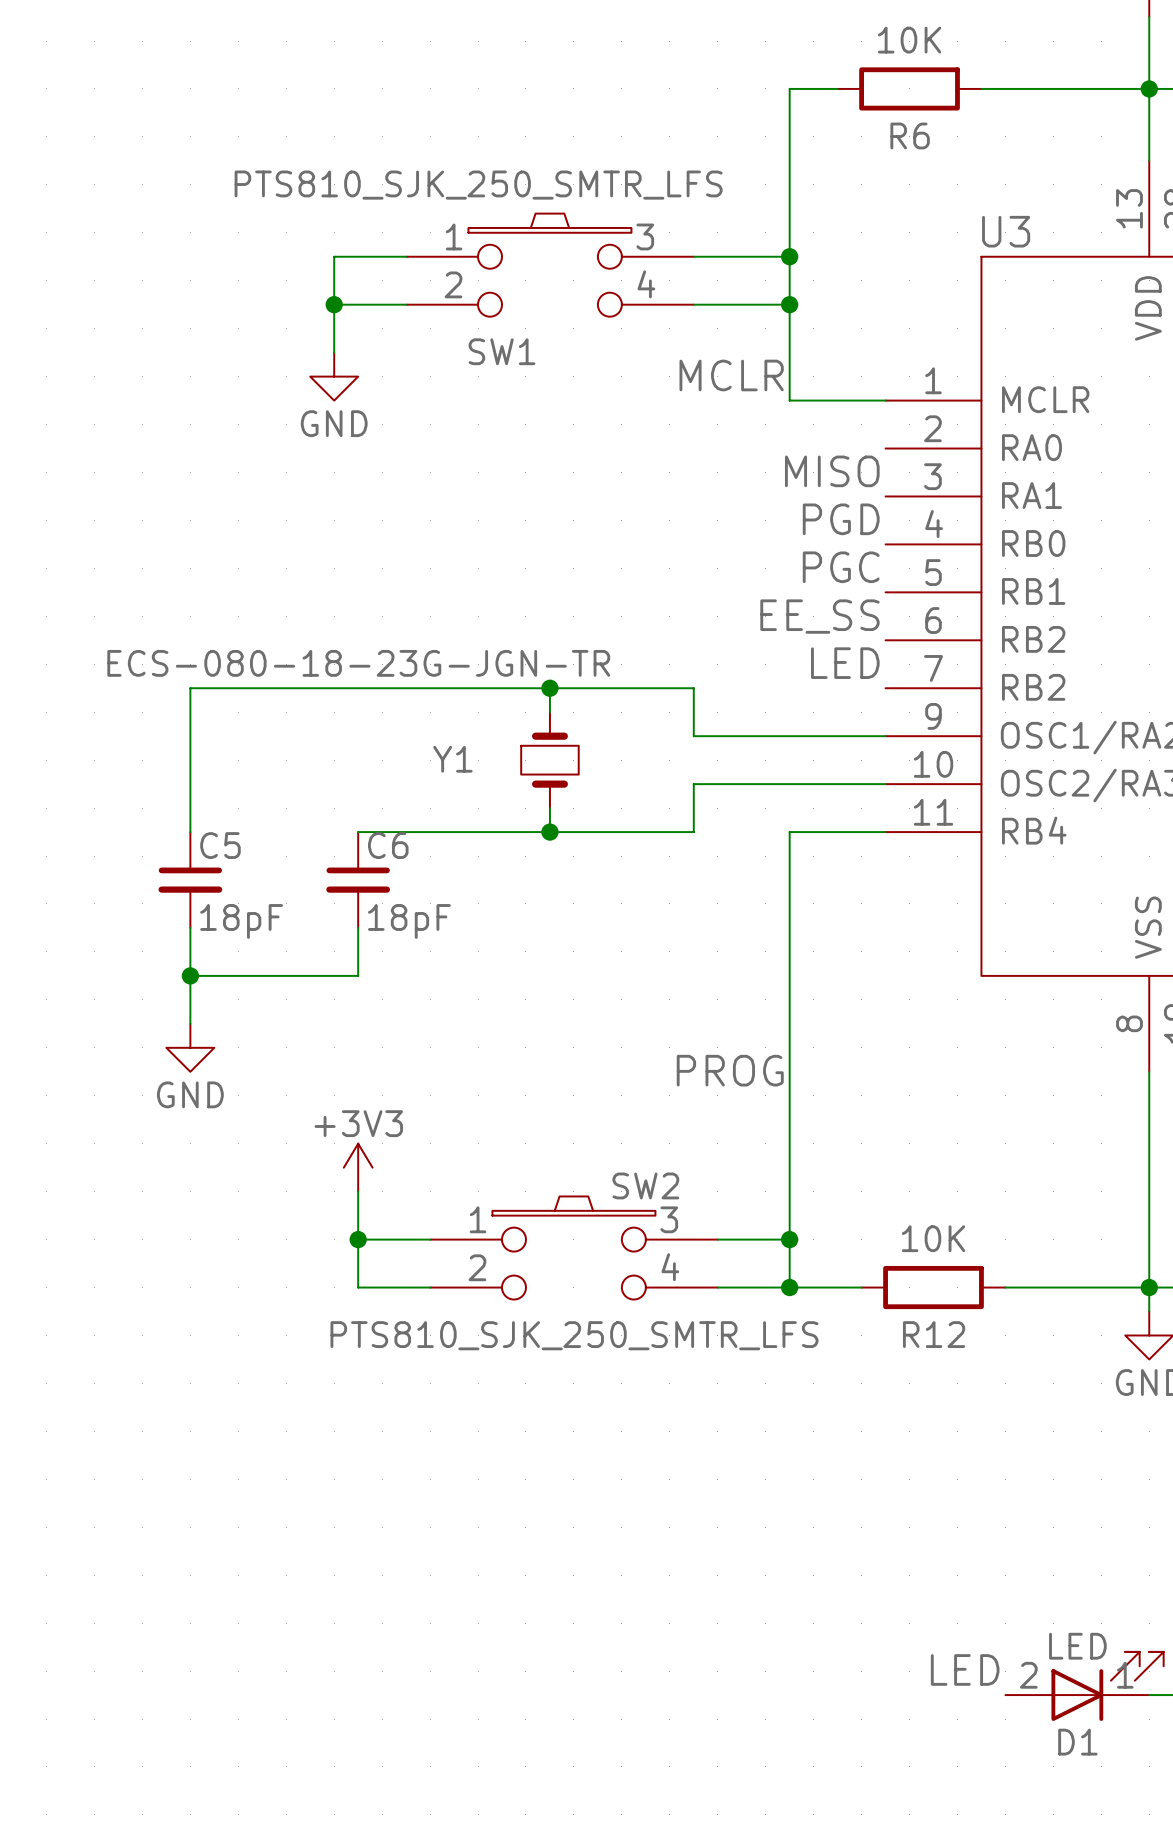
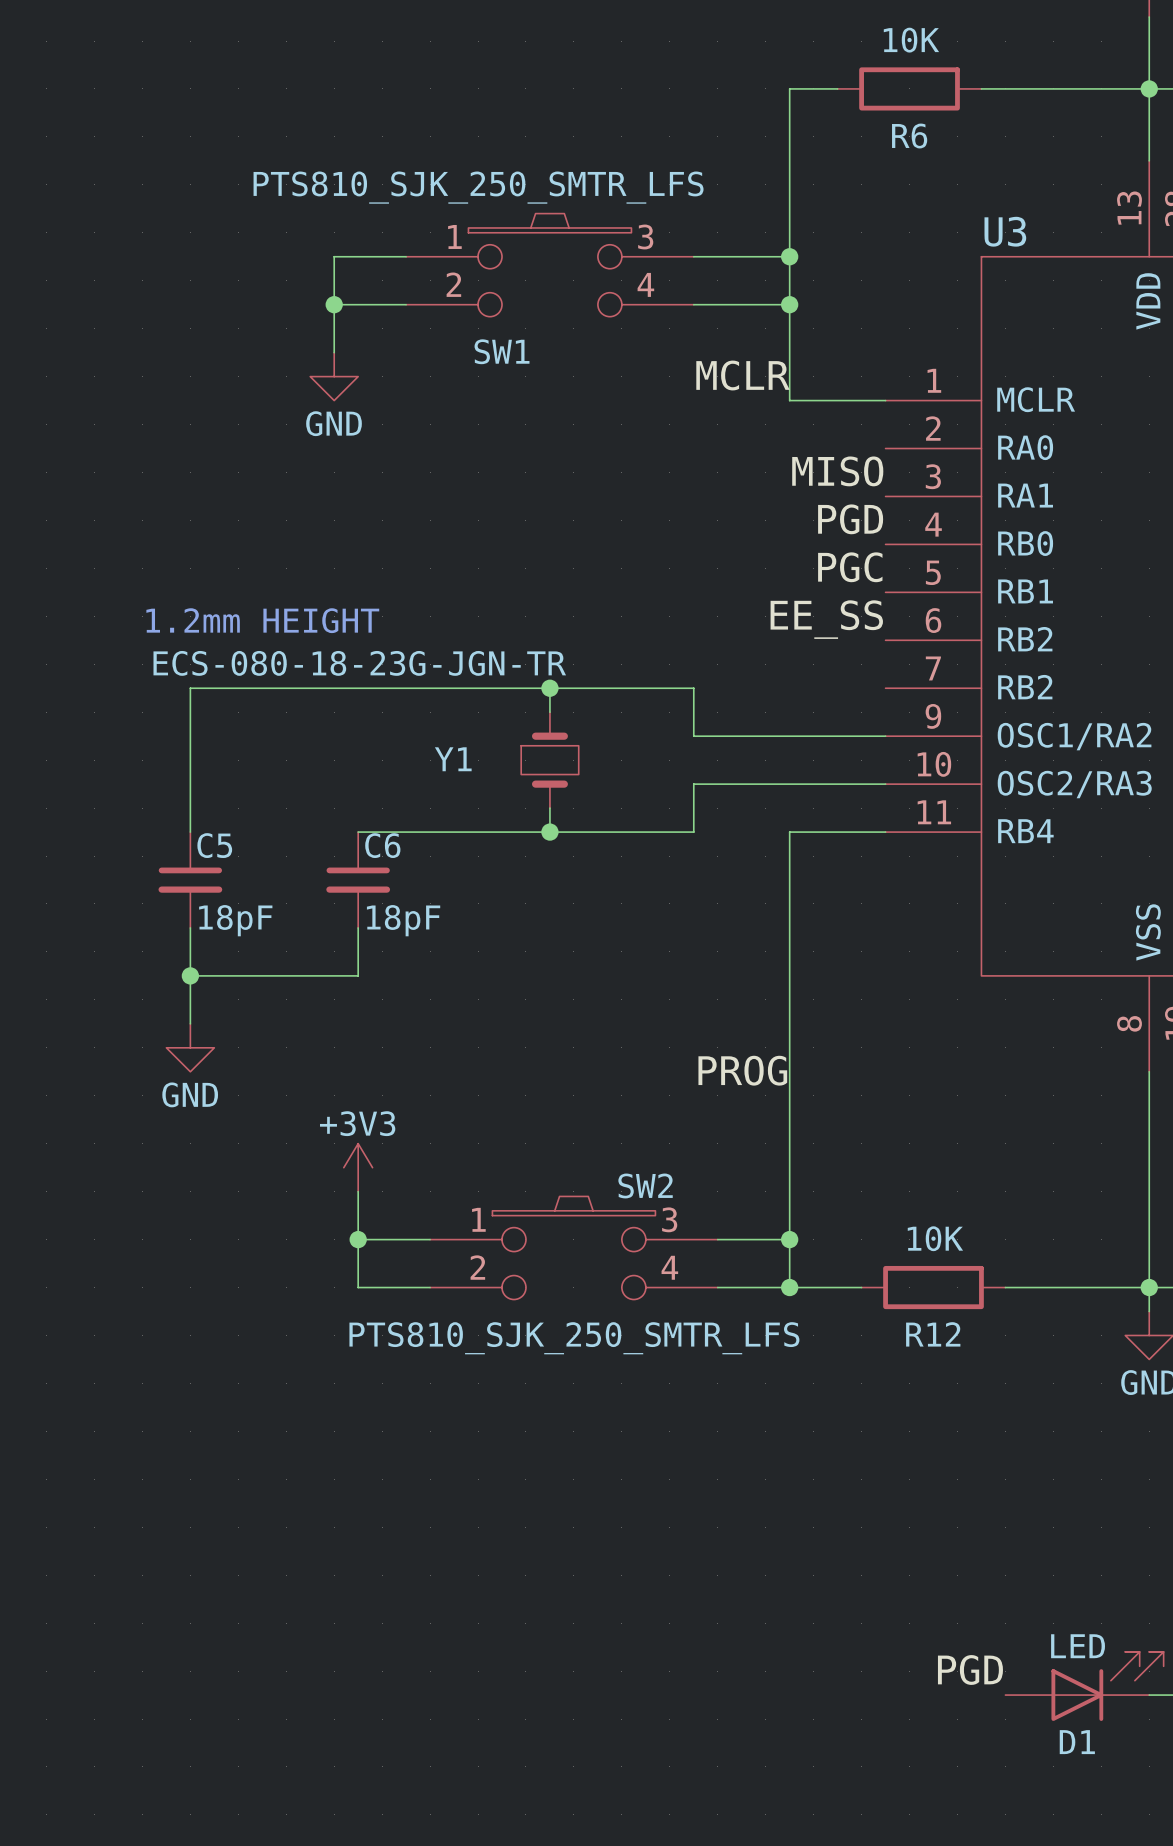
text: none -> 1.2mm HEIGHT (262, 620)
label: LED (845, 663) -> none
label: LED (965, 1669) -> PGD (970, 1669)
D1 pin number: 2 (1028, 1675) -> none
D1 pin number: 1 (1125, 1675) -> none

